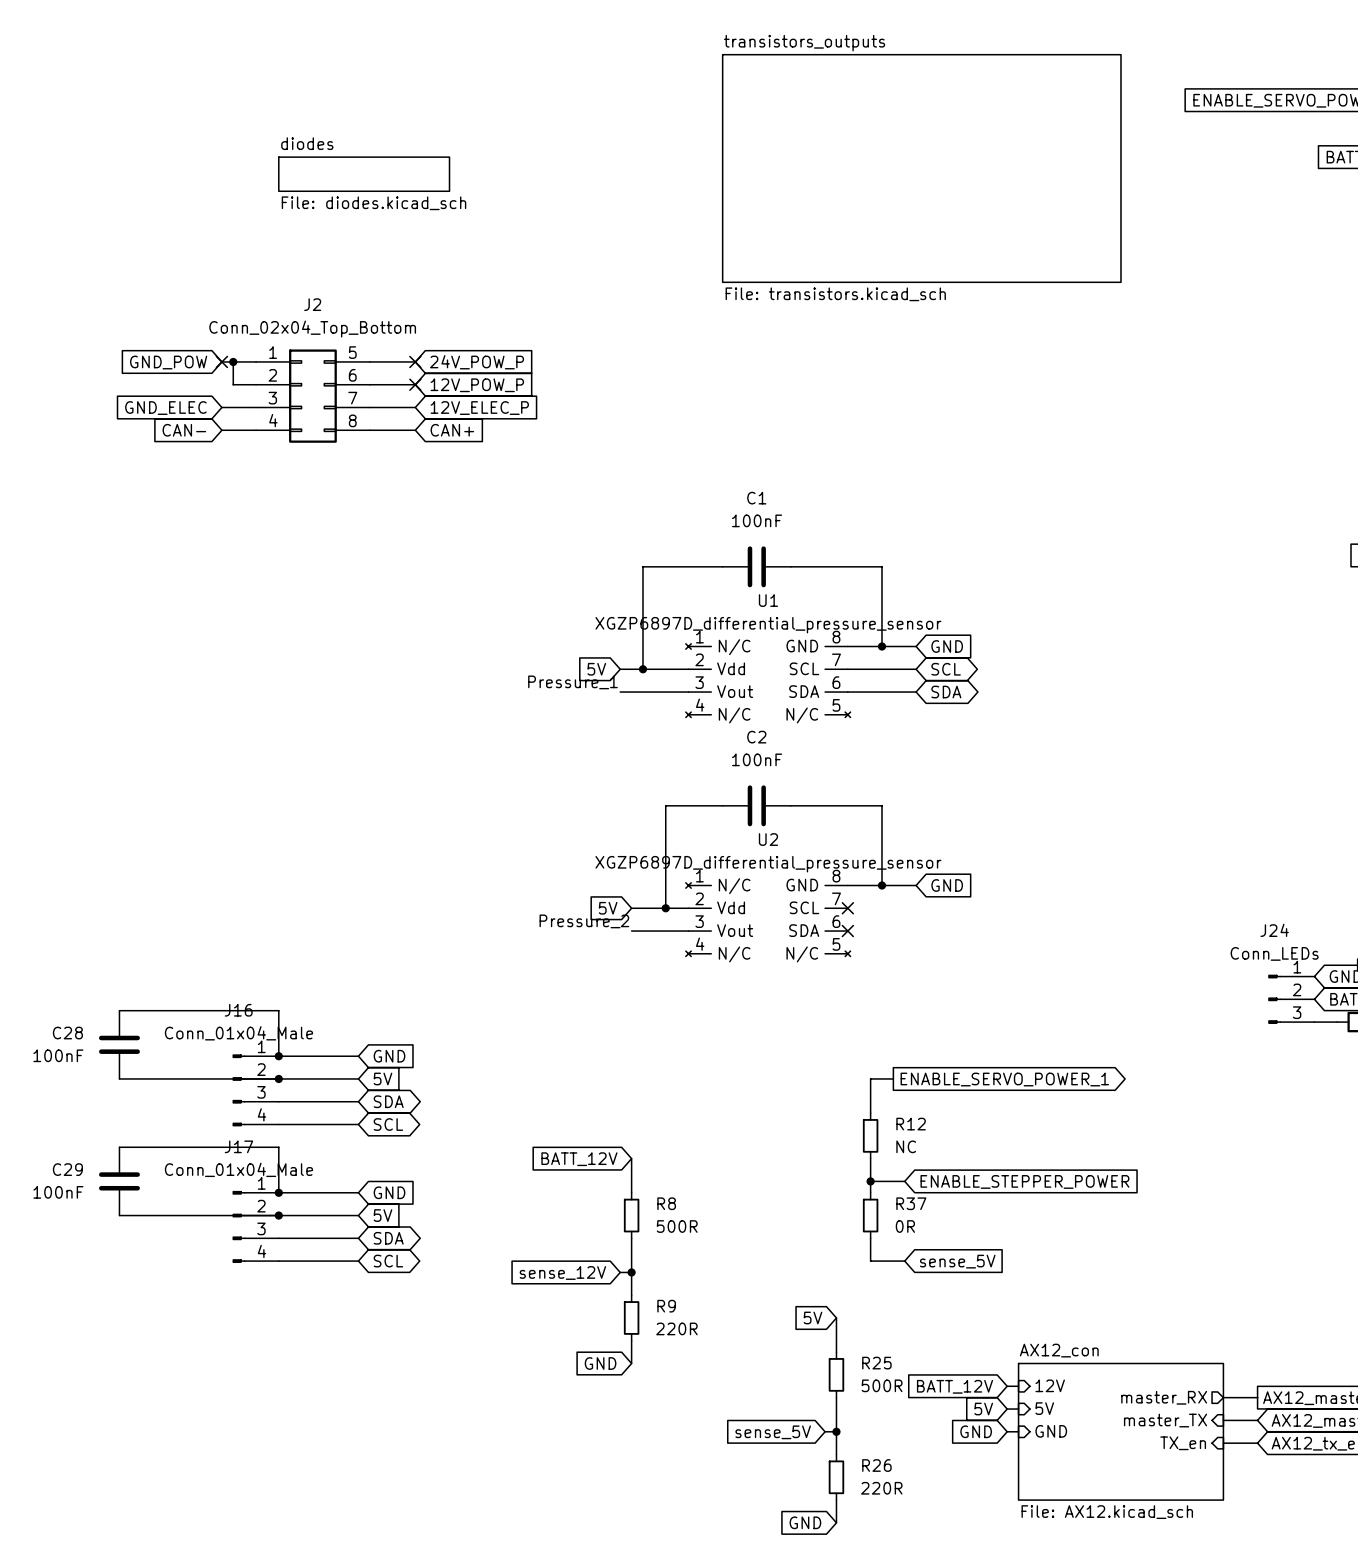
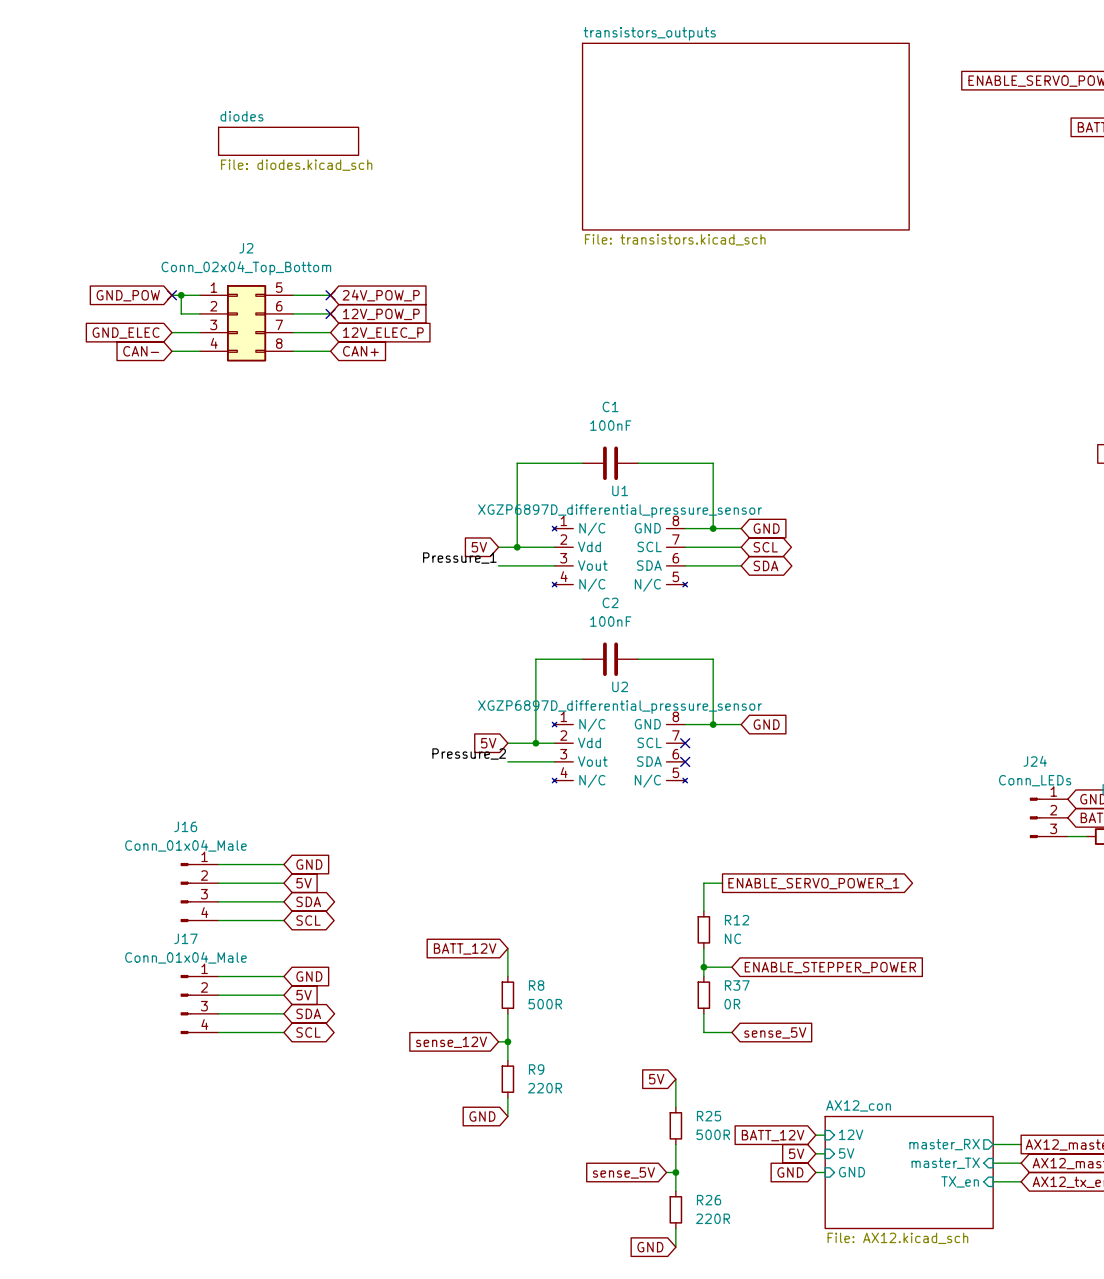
wire: (119, 1010) (278, 1010) (278, 1056) -> none
C28: 100nF (119, 1044) -> none
junction: (278, 1056) -> none
wire: (119, 1078) (278, 1078) -> none
junction: (278, 1078) -> none
wire: (119, 1147) (278, 1147) (278, 1192) -> none
C29: 100nF (119, 1181) -> none
junction: (278, 1192) -> none
wire: (119, 1215) (278, 1215) -> none
junction: (278, 1215) -> none

